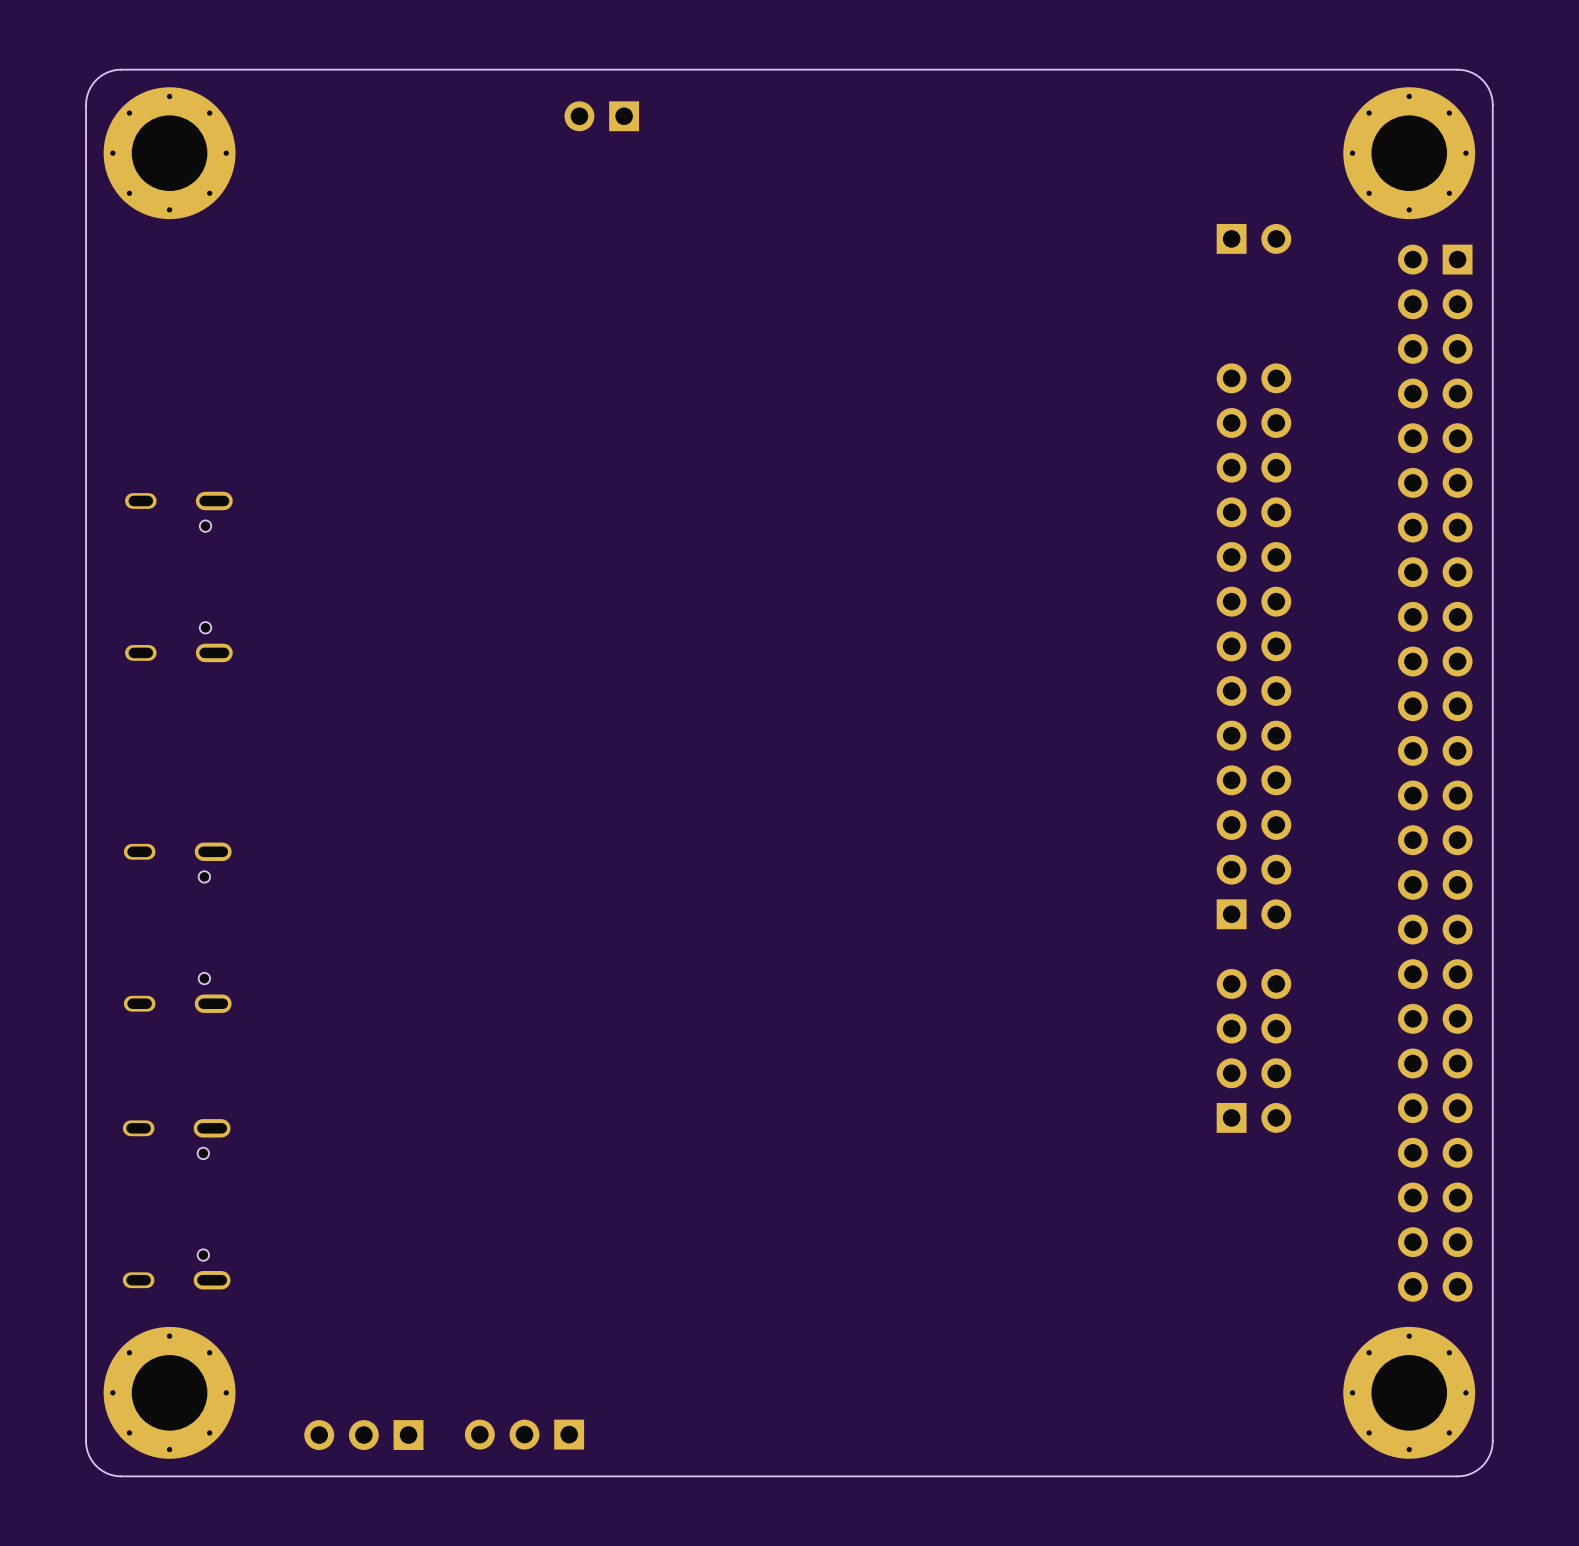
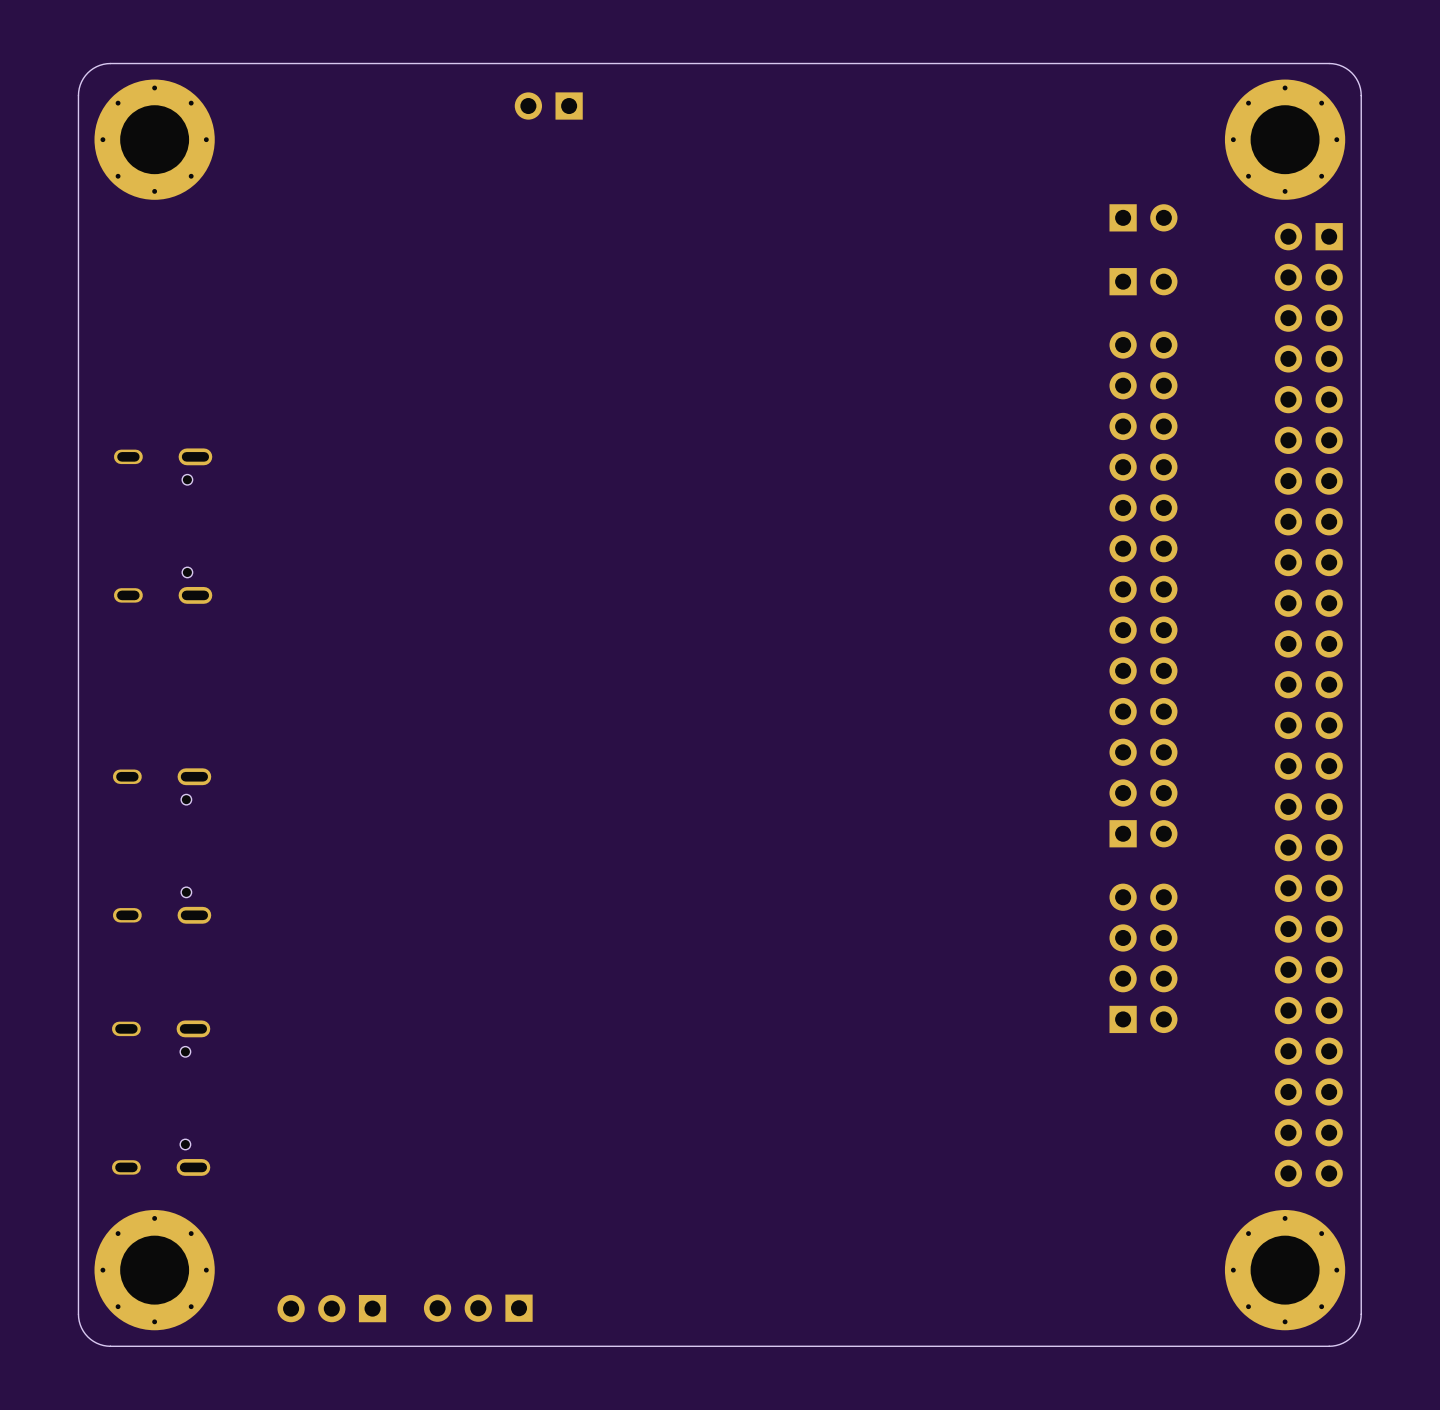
part: none -> (1143, 281)

